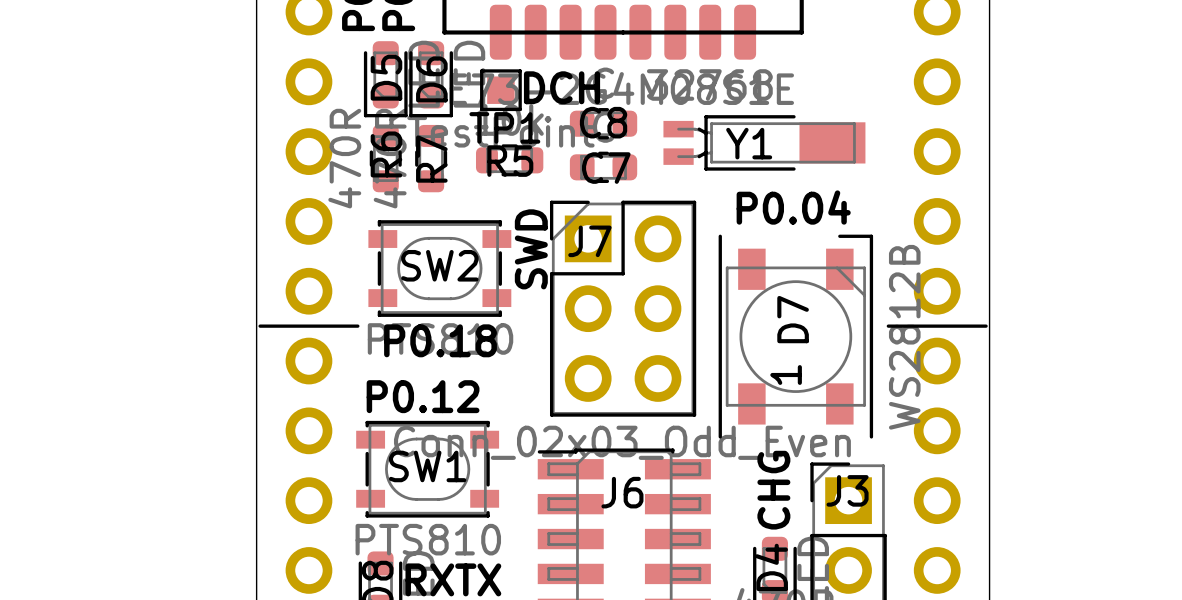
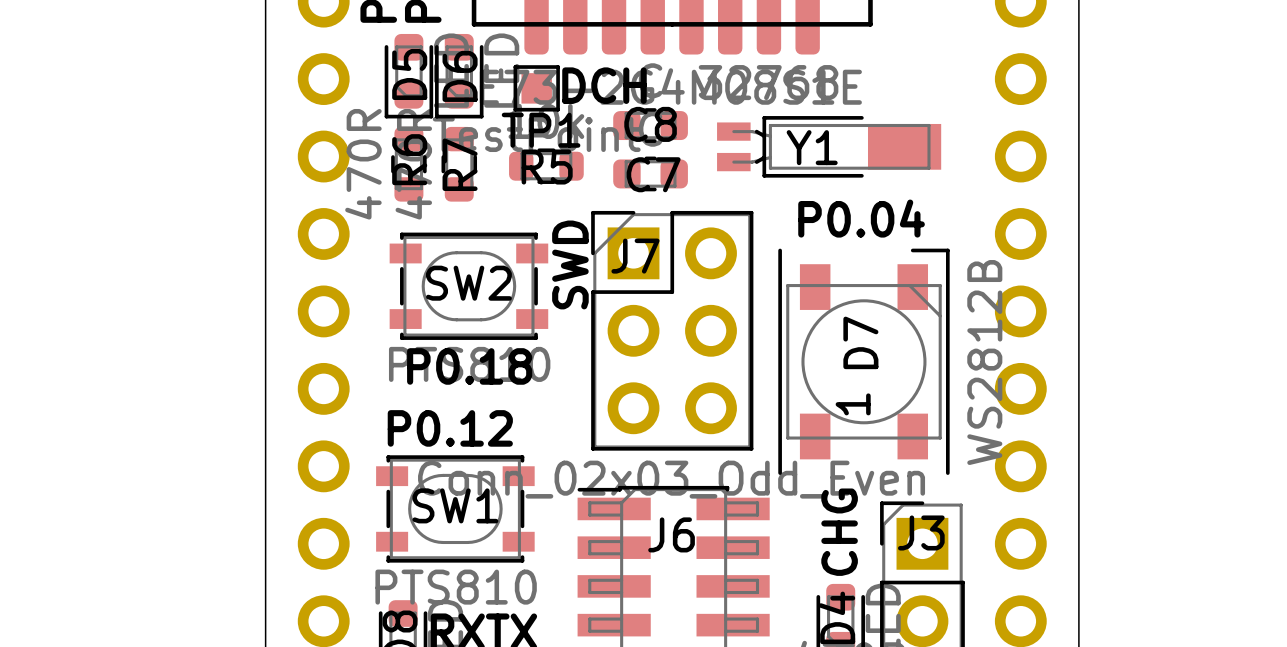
line: (260, 326) (357, 326) -> none
line: (888, 326) (986, 326) -> none

